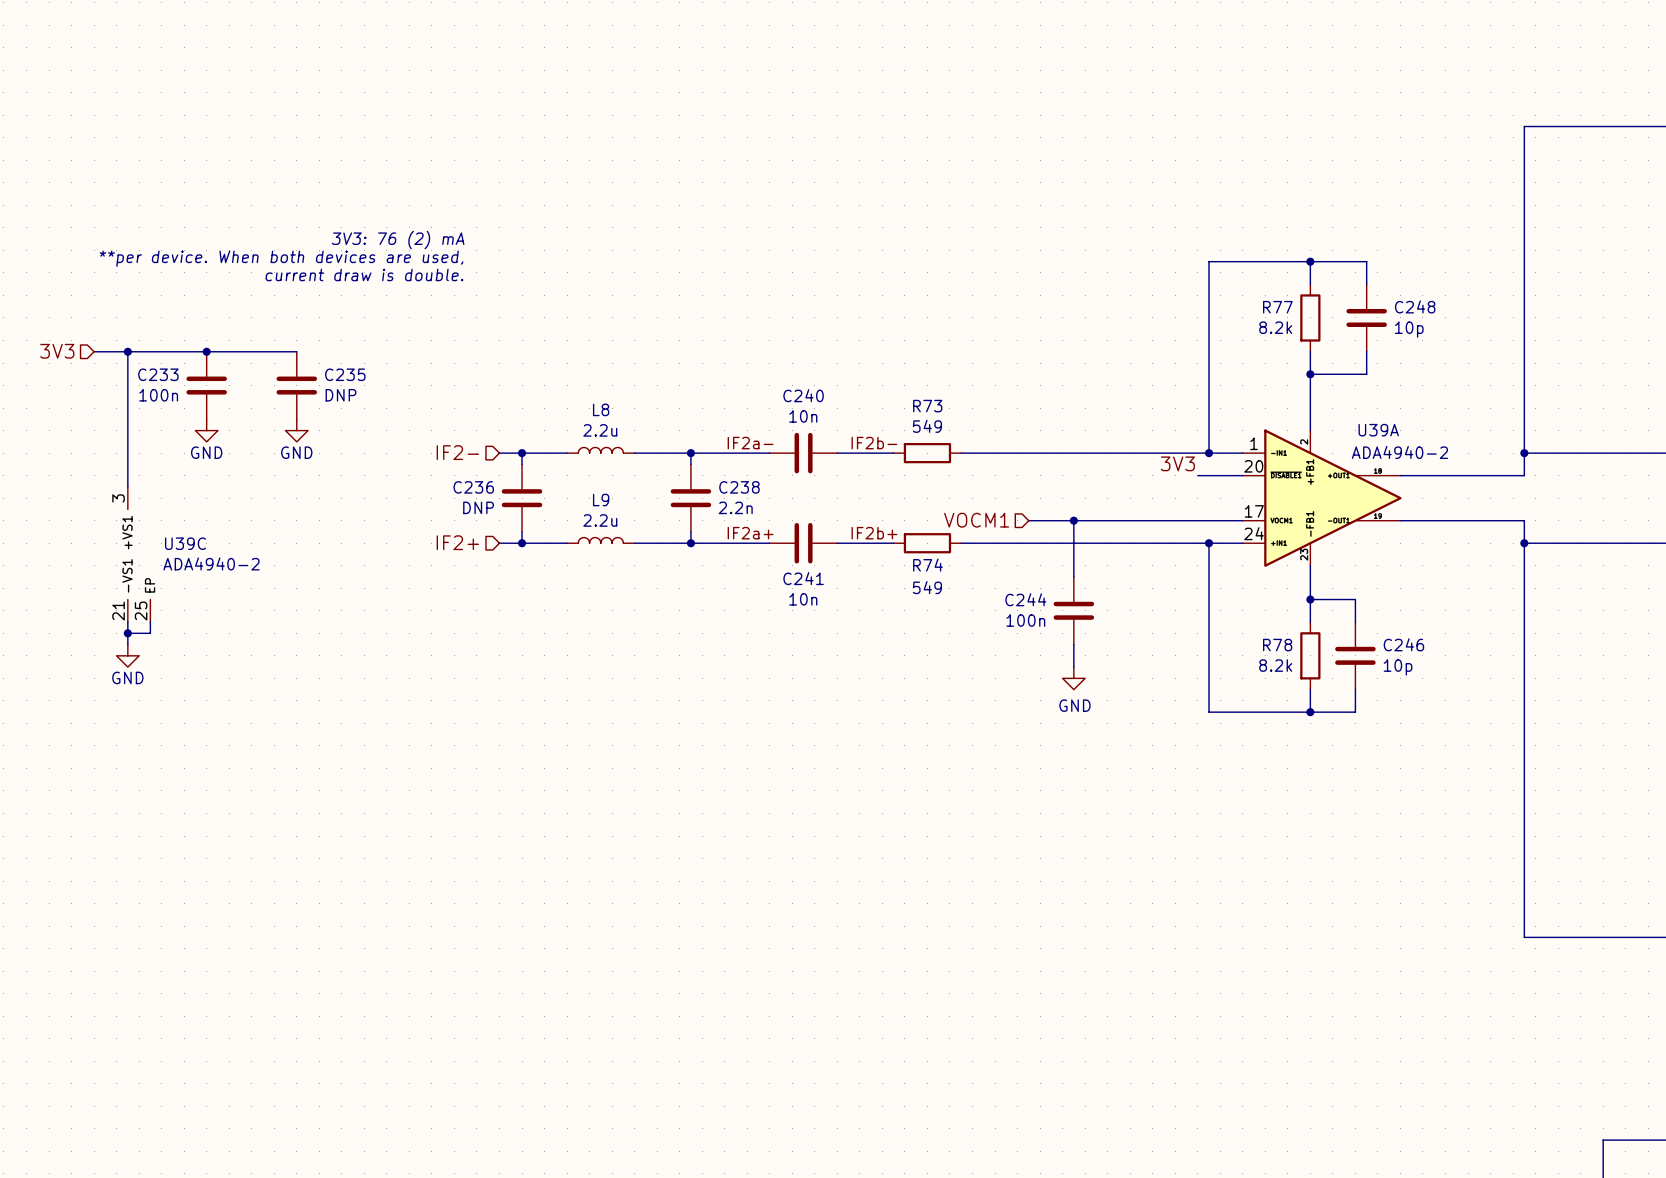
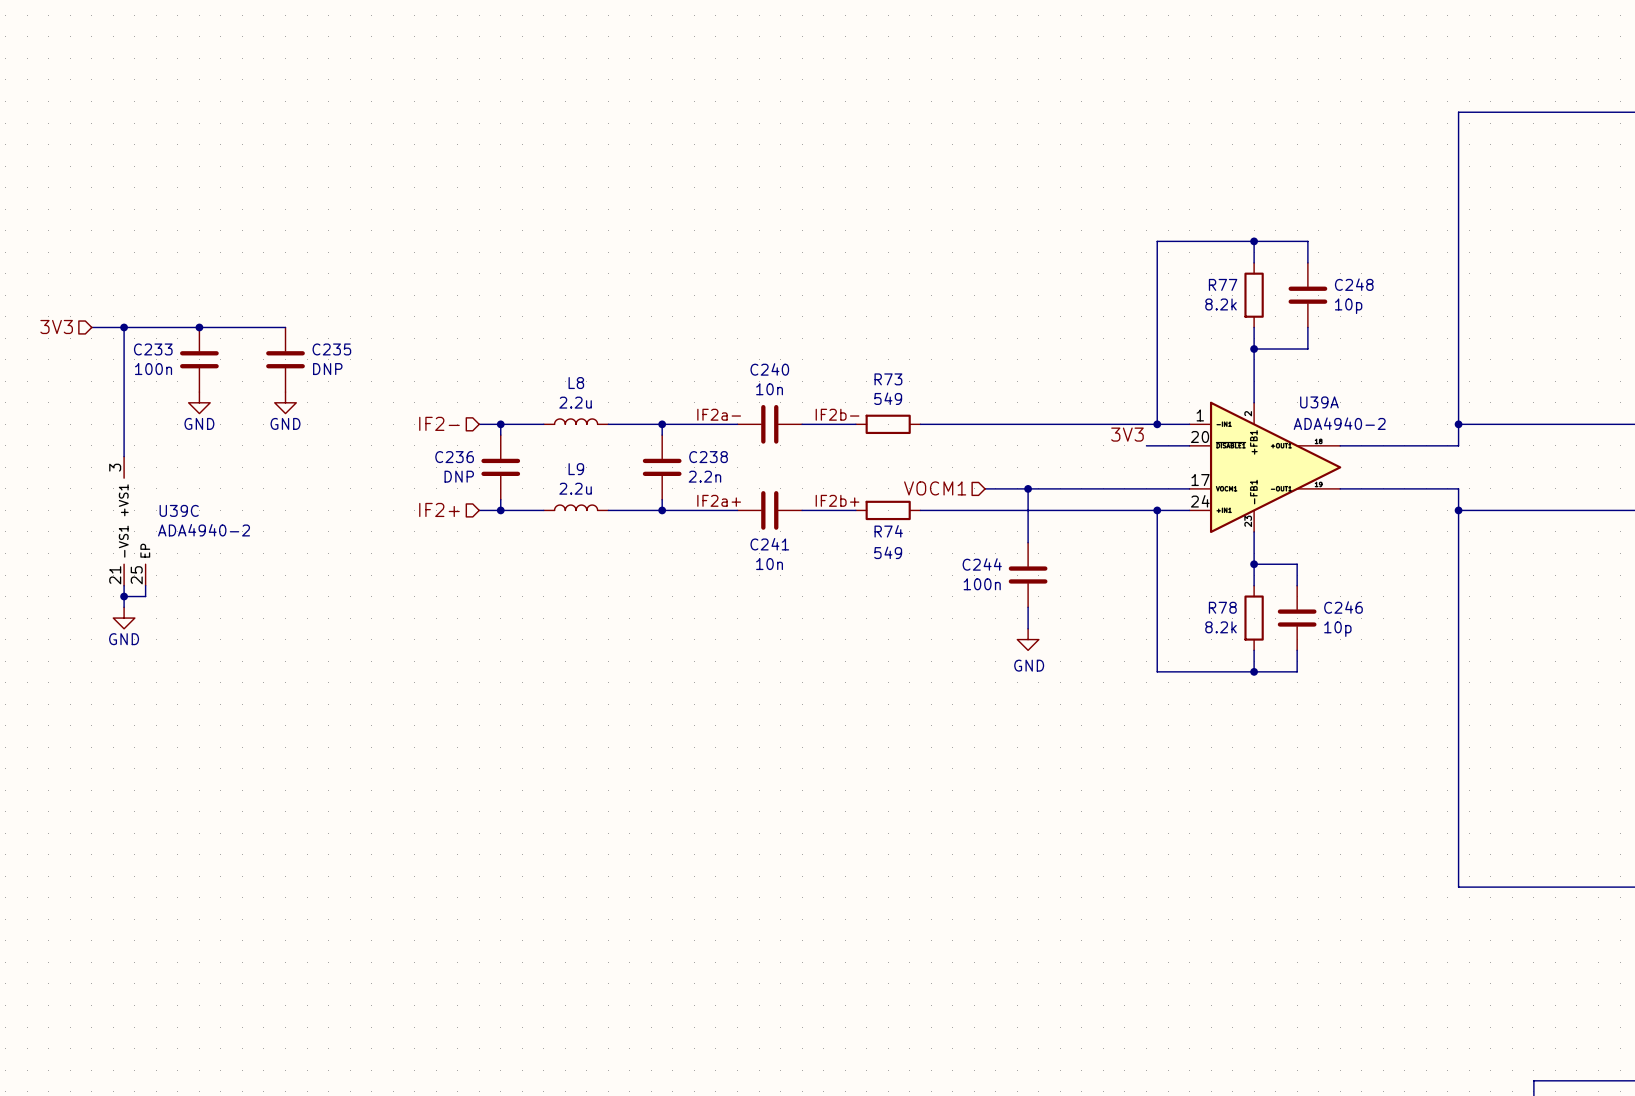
text: 3V3: 76 (2) mA (398, 240) -> none
text: **per device. When both devices are used, (281, 258) -> none
text: current draw is double. (364, 274) -> none

